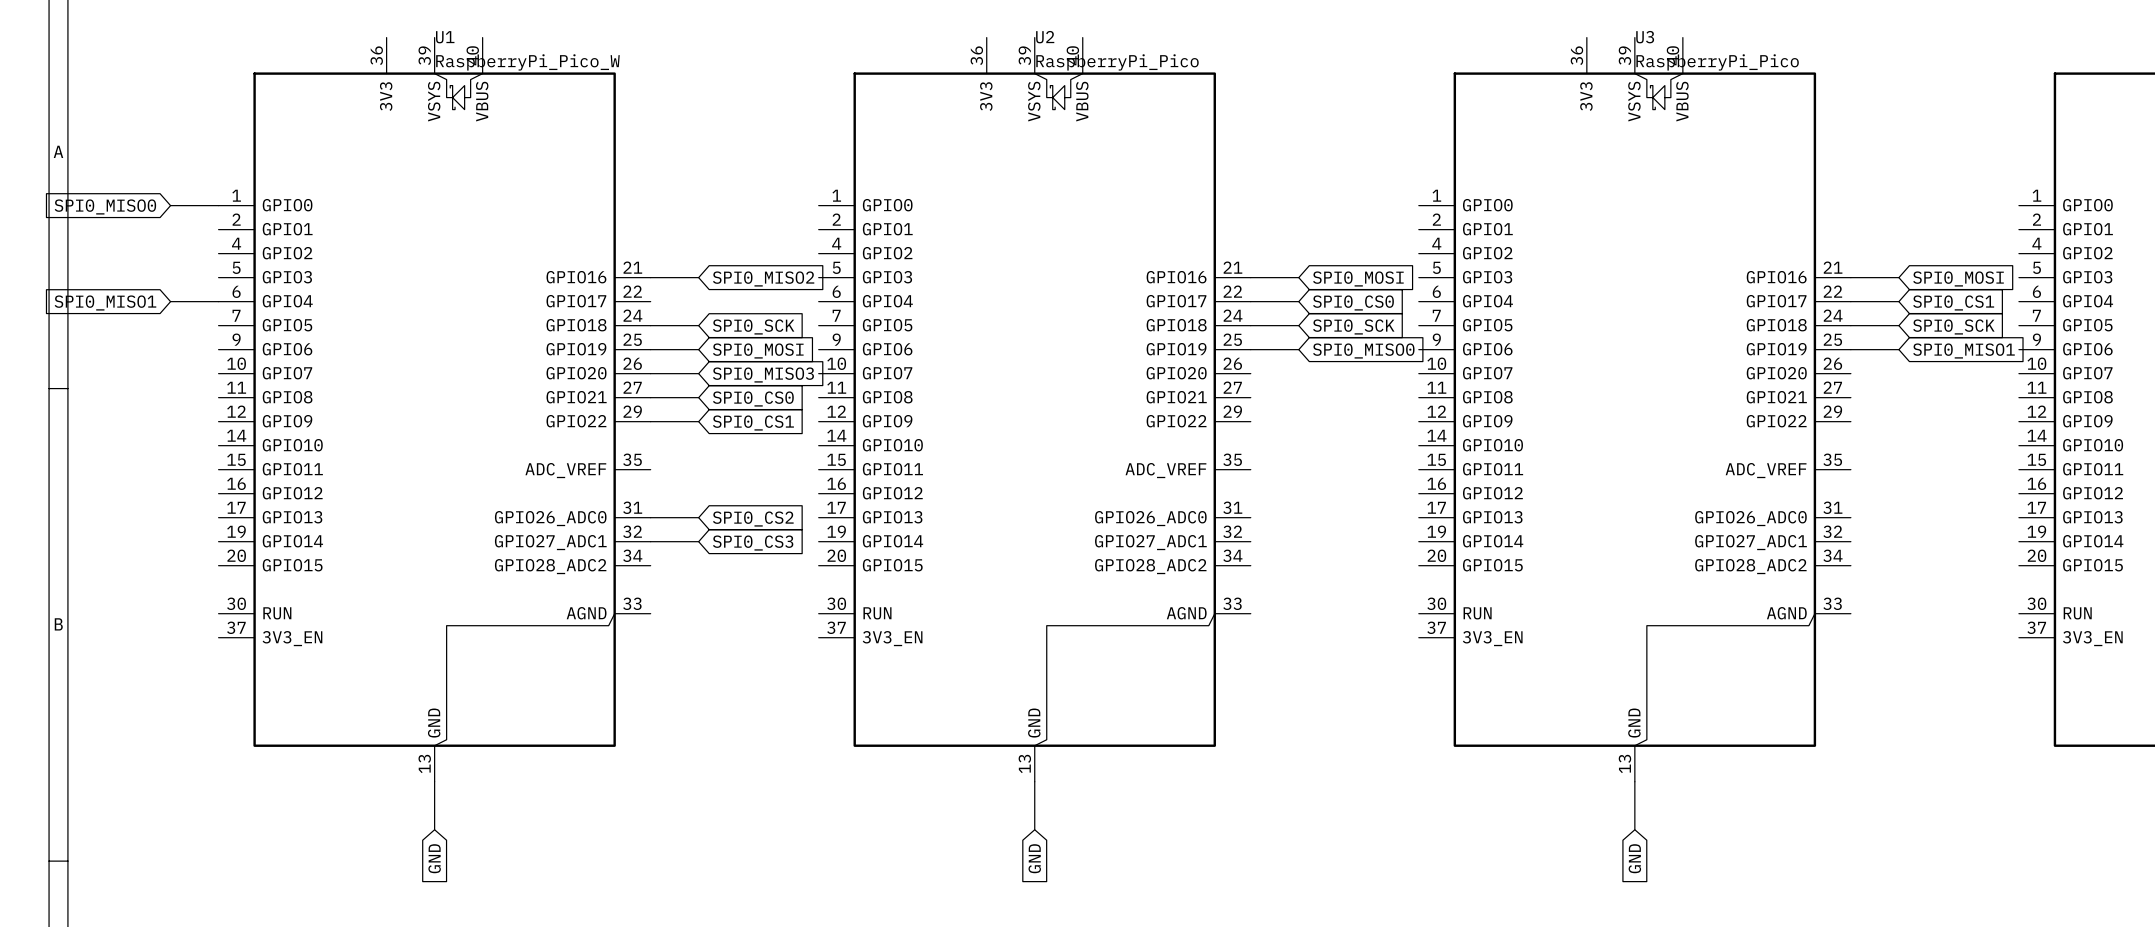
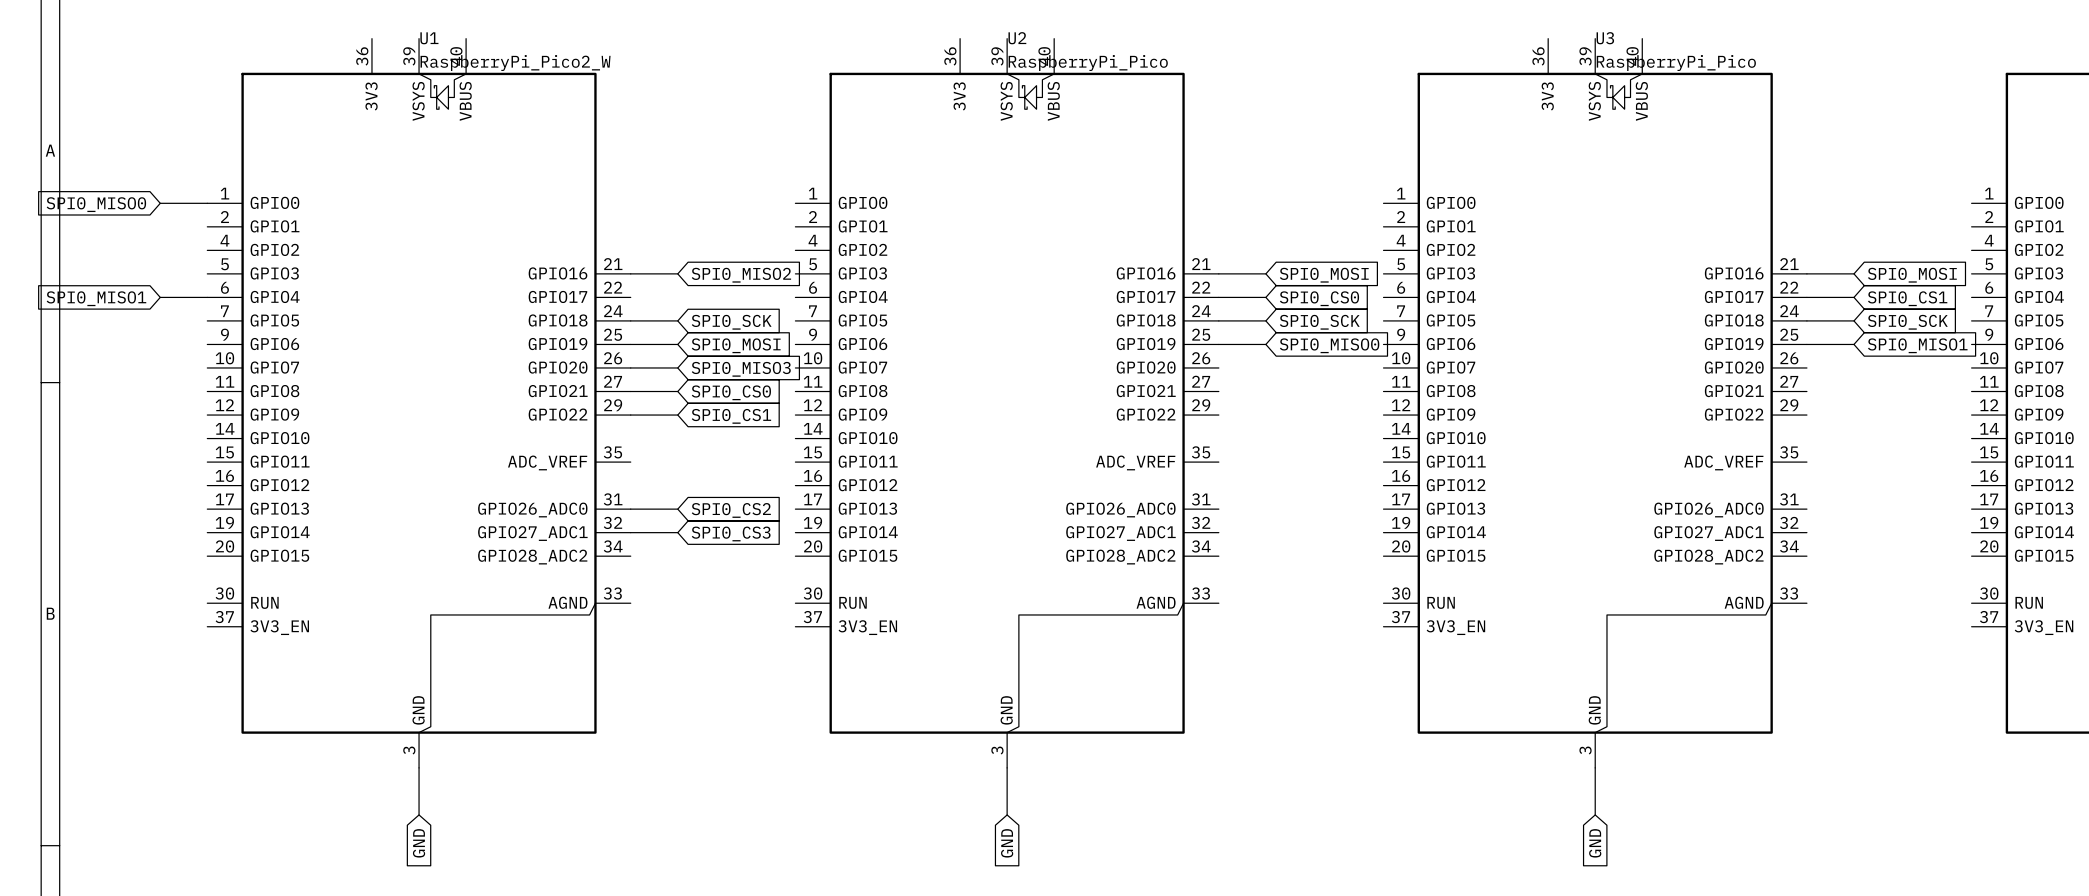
U1 value: RaspberryPi_Pico_W (527, 62) -> RaspberryPi_Pico2_W (515, 62)
U1 pin number: 13 (424, 763) -> 3 (409, 750)
U2 pin number: 13 (1024, 763) -> 3 (997, 750)
U3 pin number: 13 (1624, 763) -> 3 (1585, 750)

